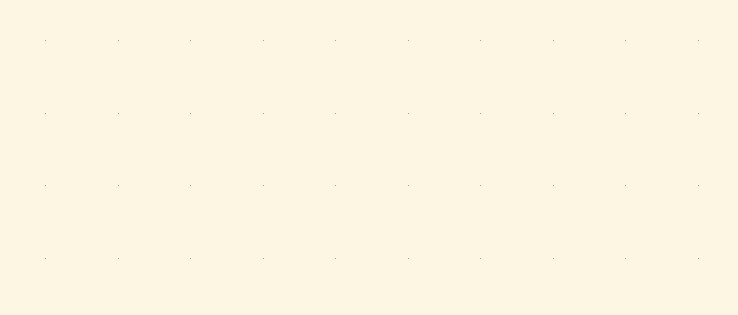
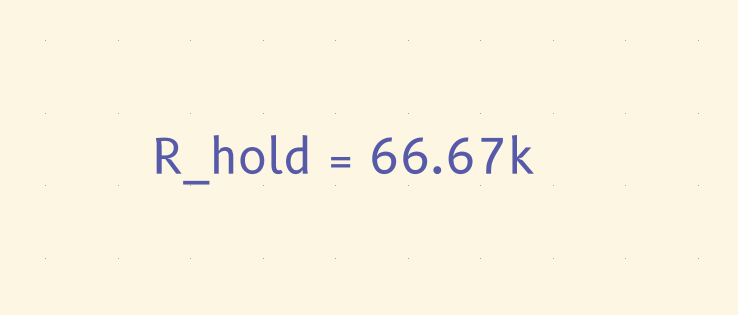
text: none -> R_hold = 66.67k (344, 159)

